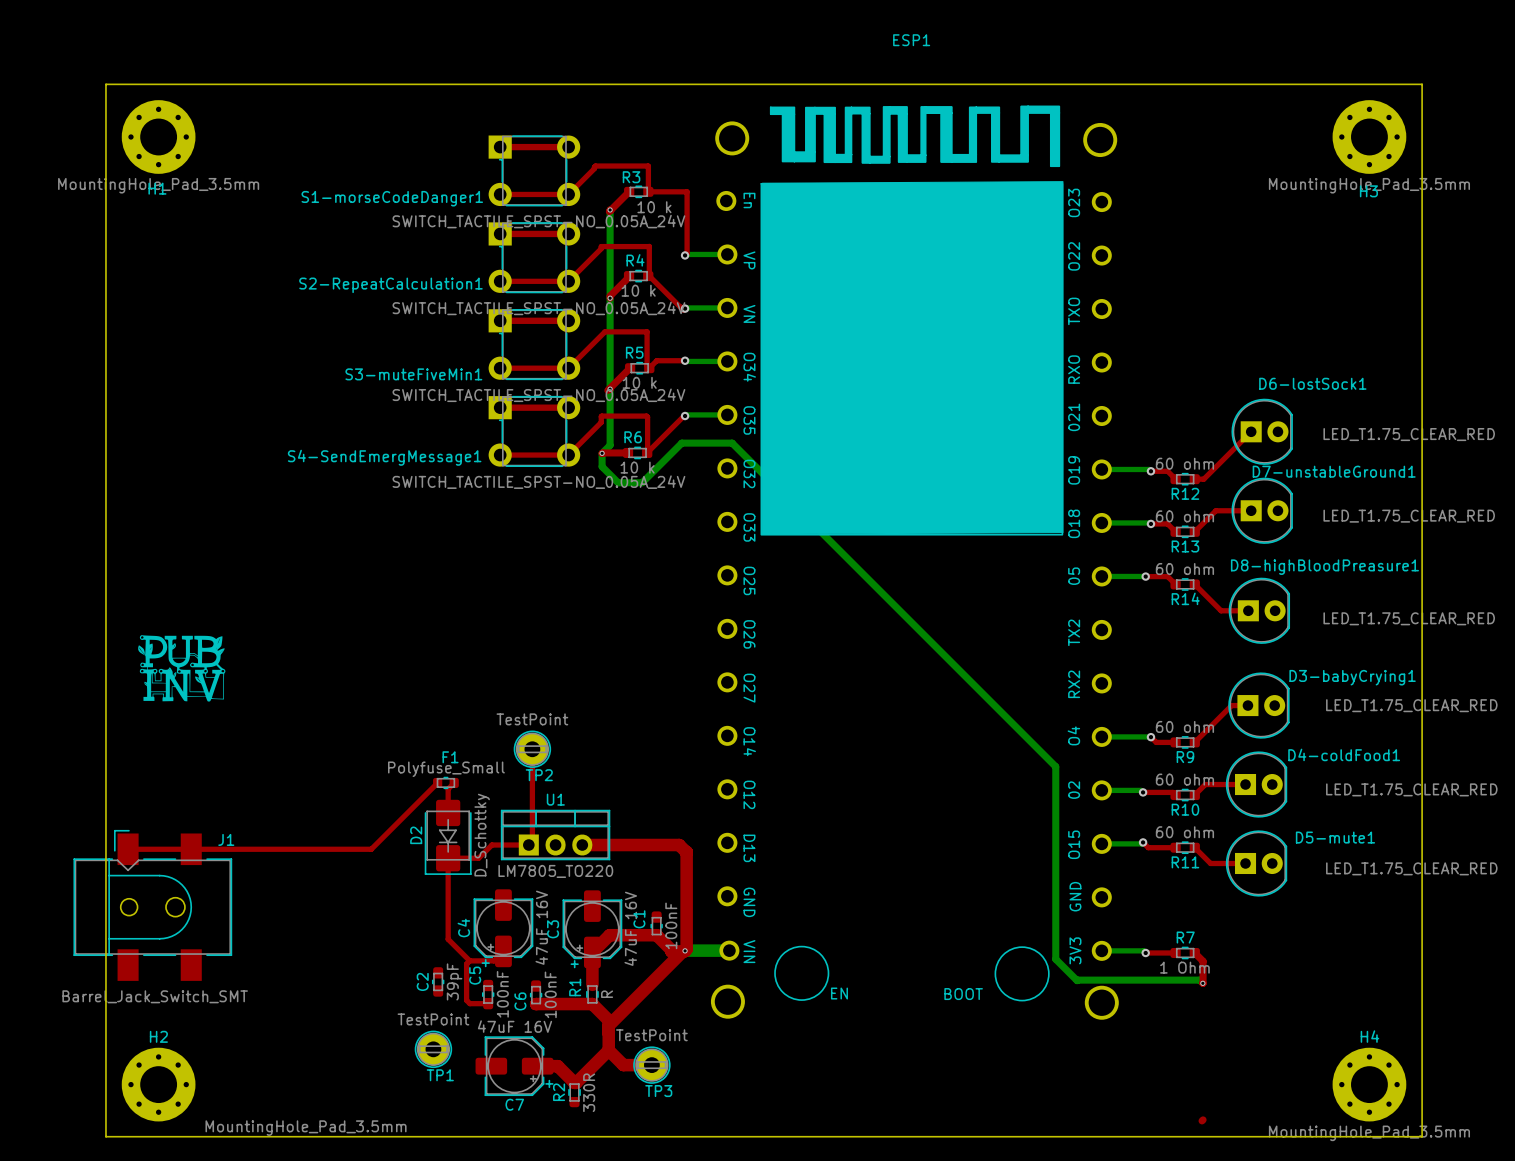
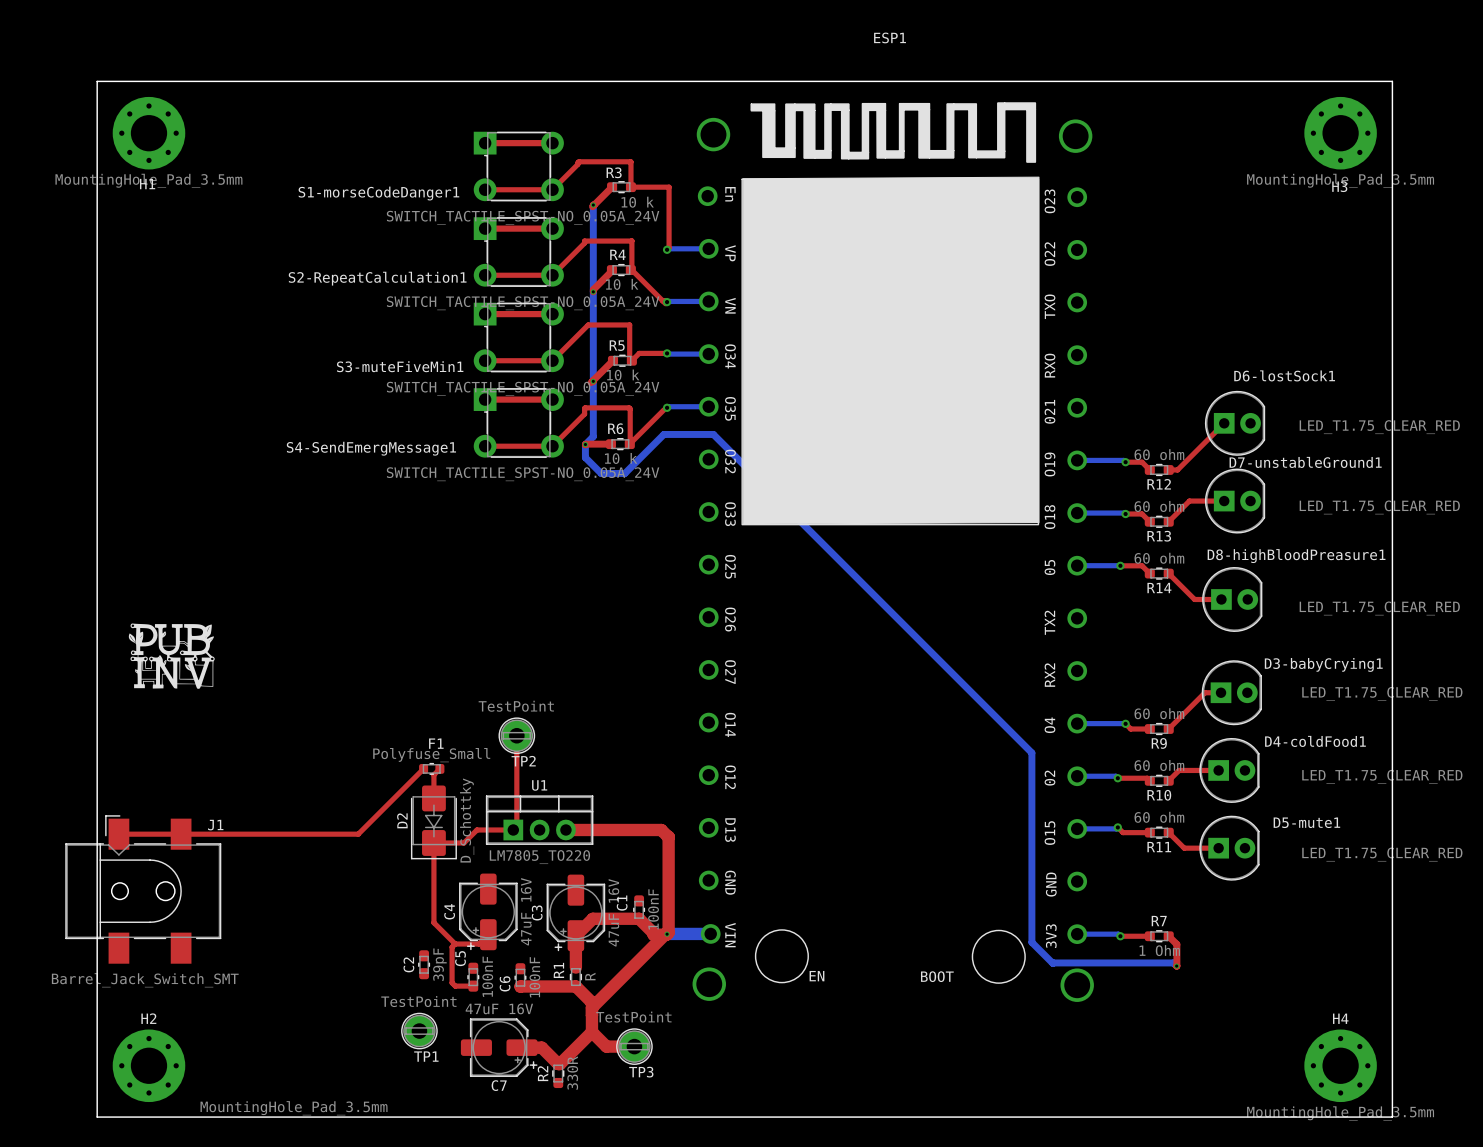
top track: (1203, 1119) (1202, 1120) -> none

